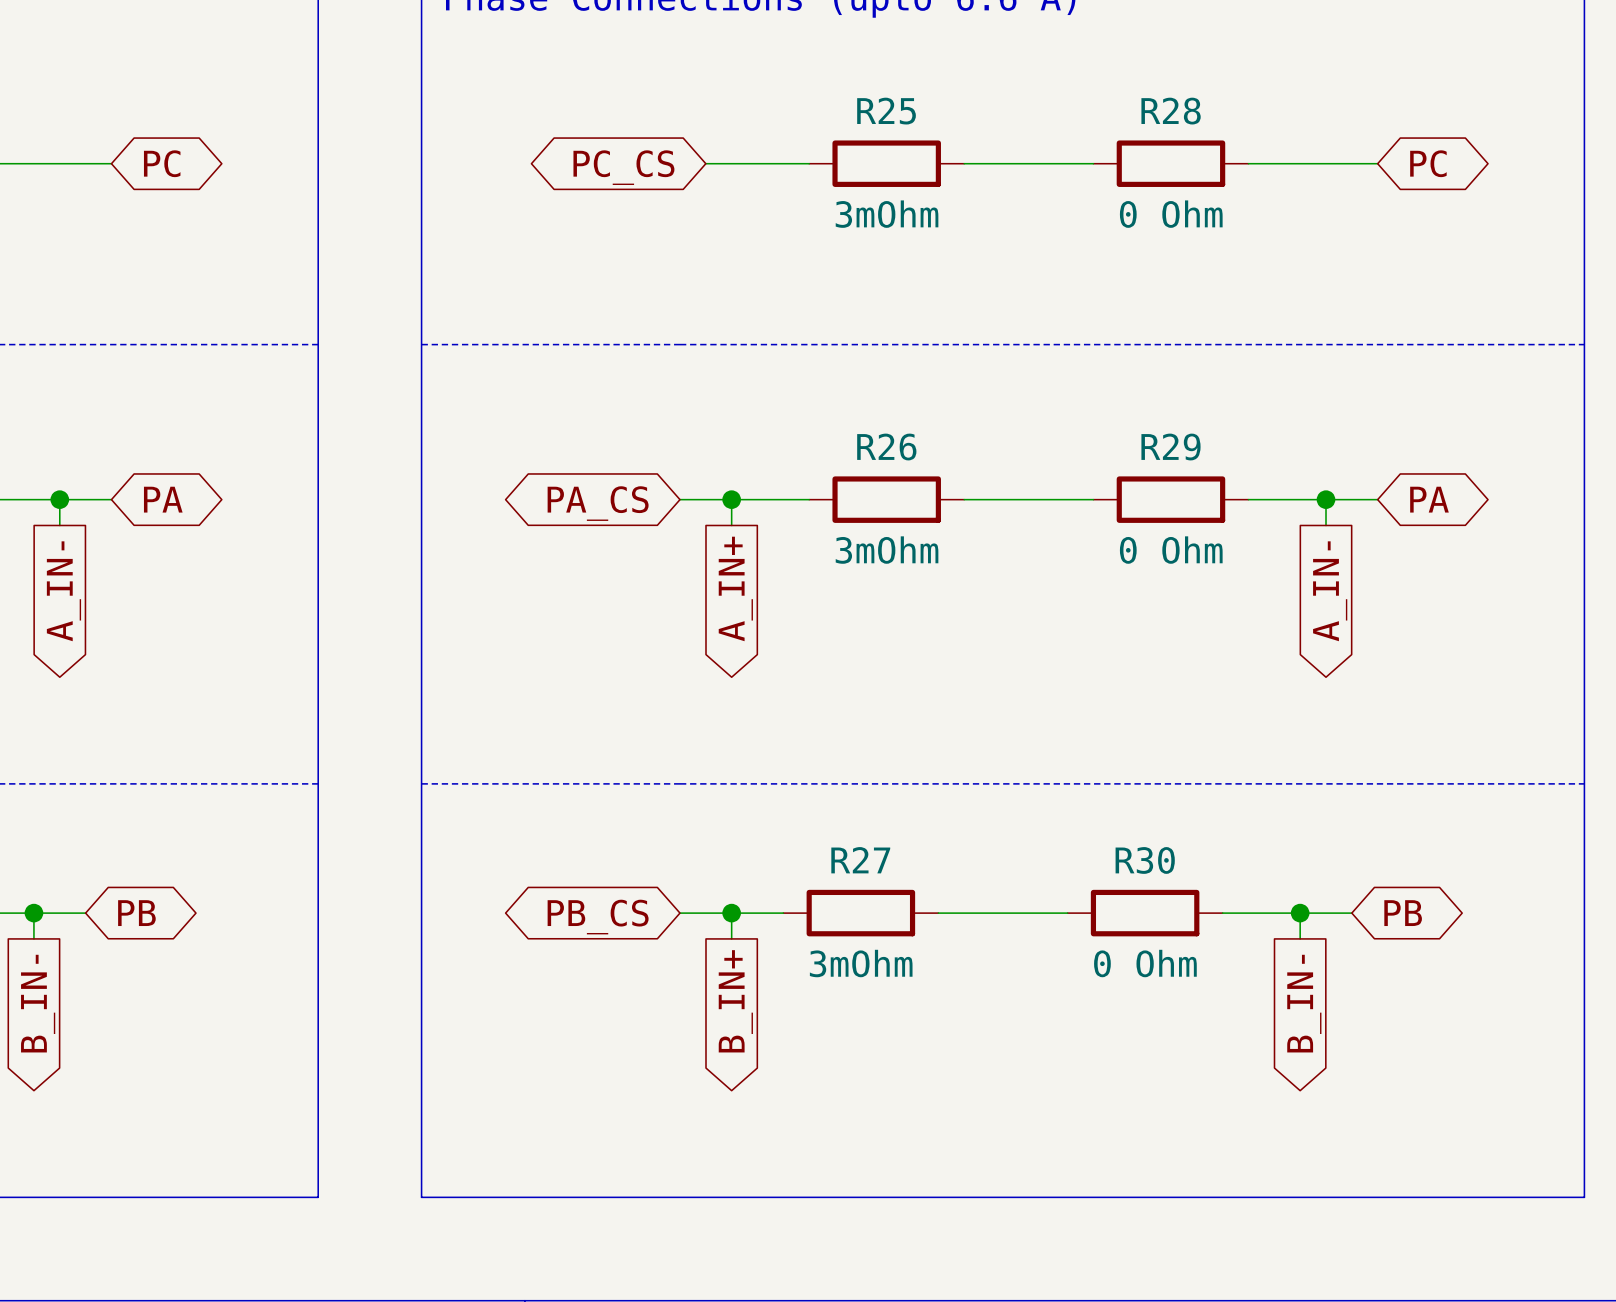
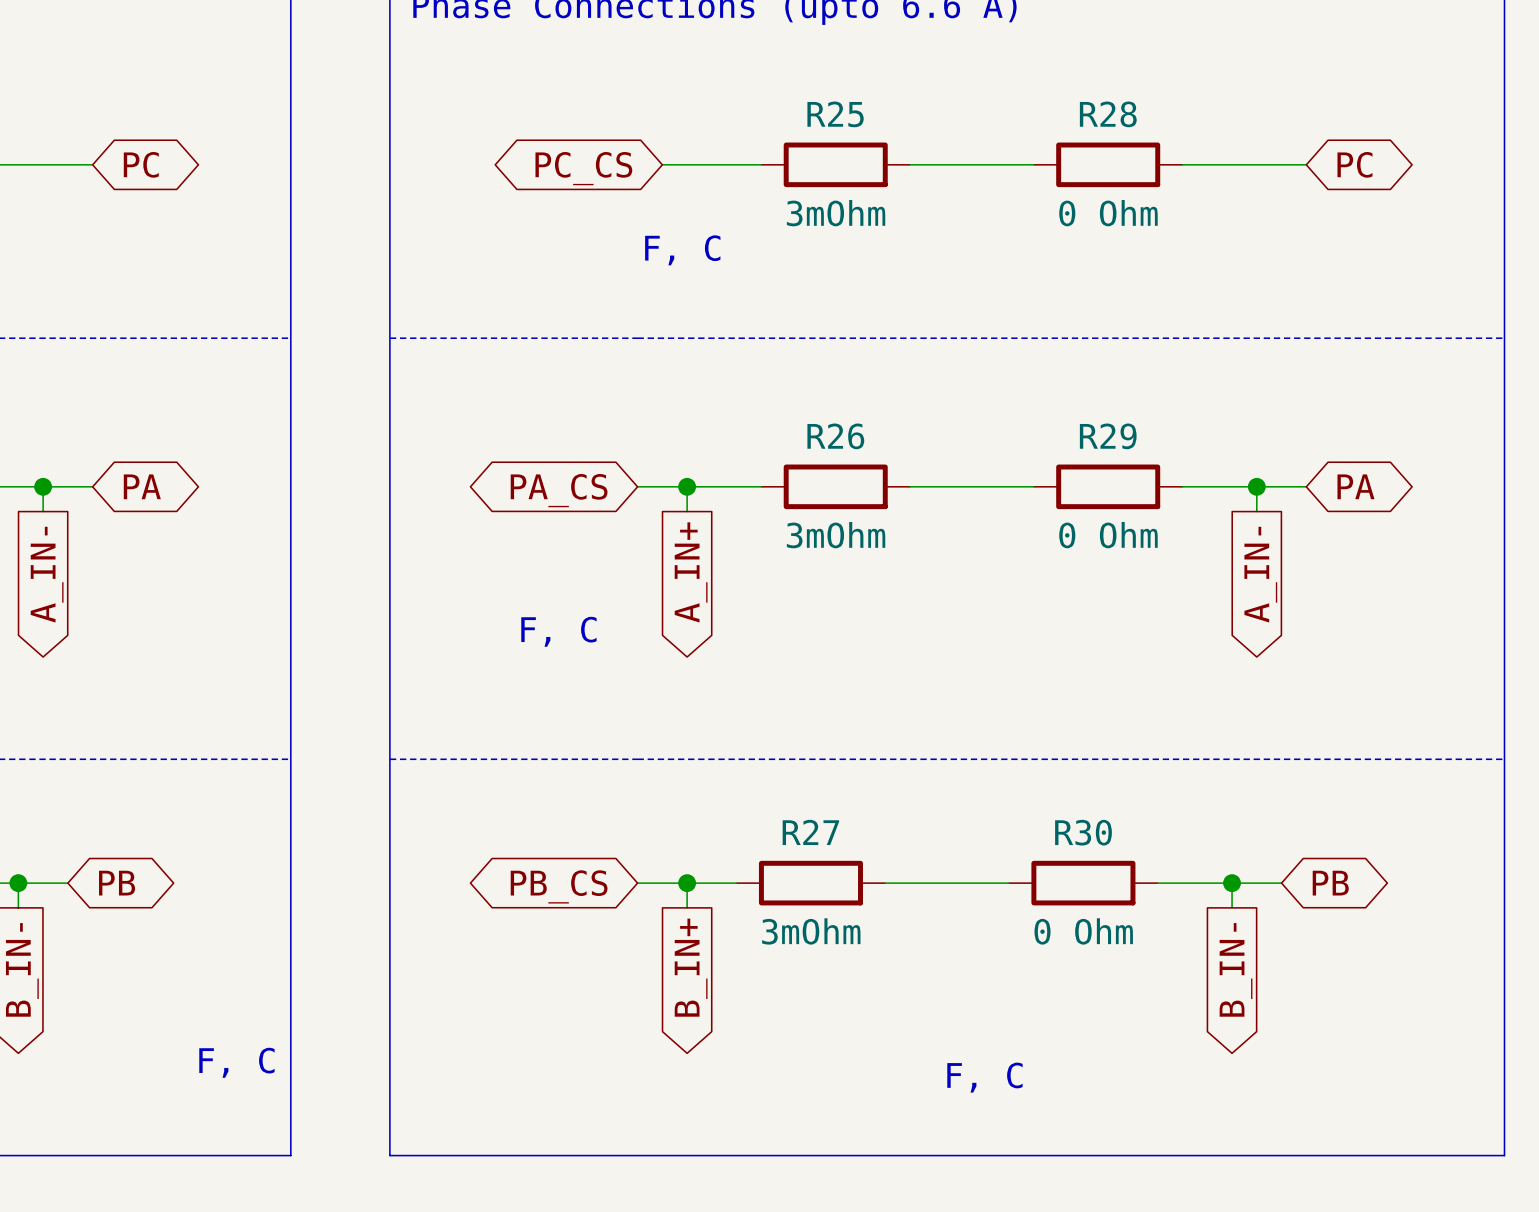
text: none -> F, C (682, 250)
text: none -> F, C (558, 631)
text: none -> F, C (236, 1062)
text: none -> F, C (984, 1077)

